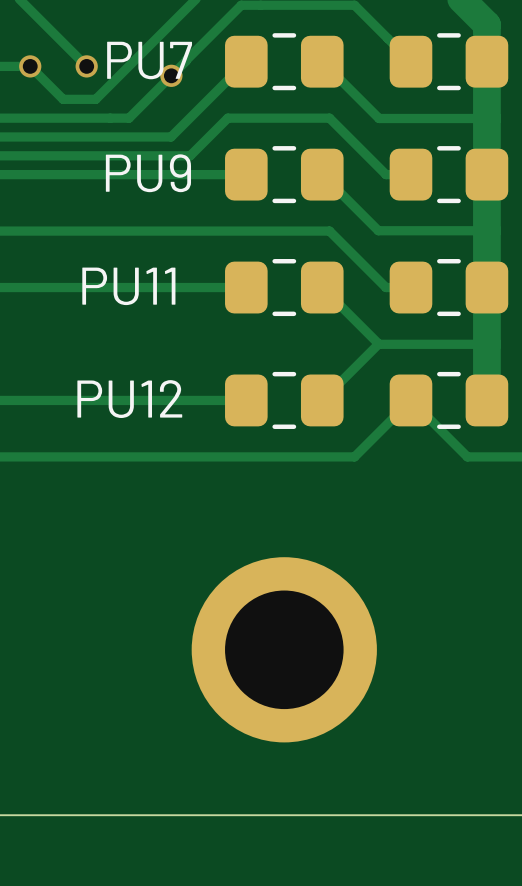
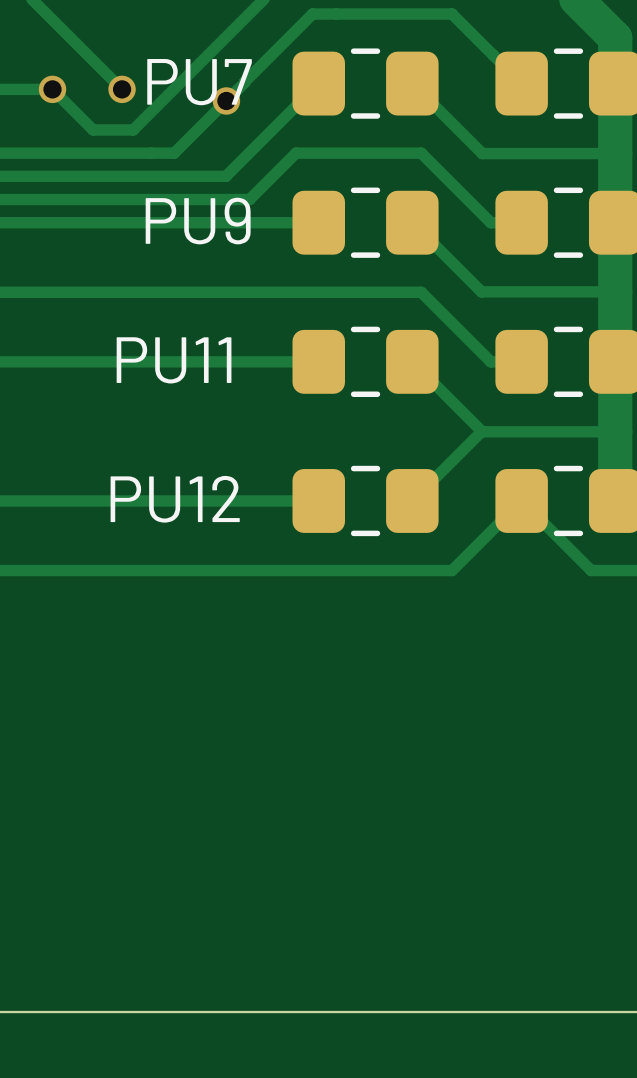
part: (284, 649) -> none

